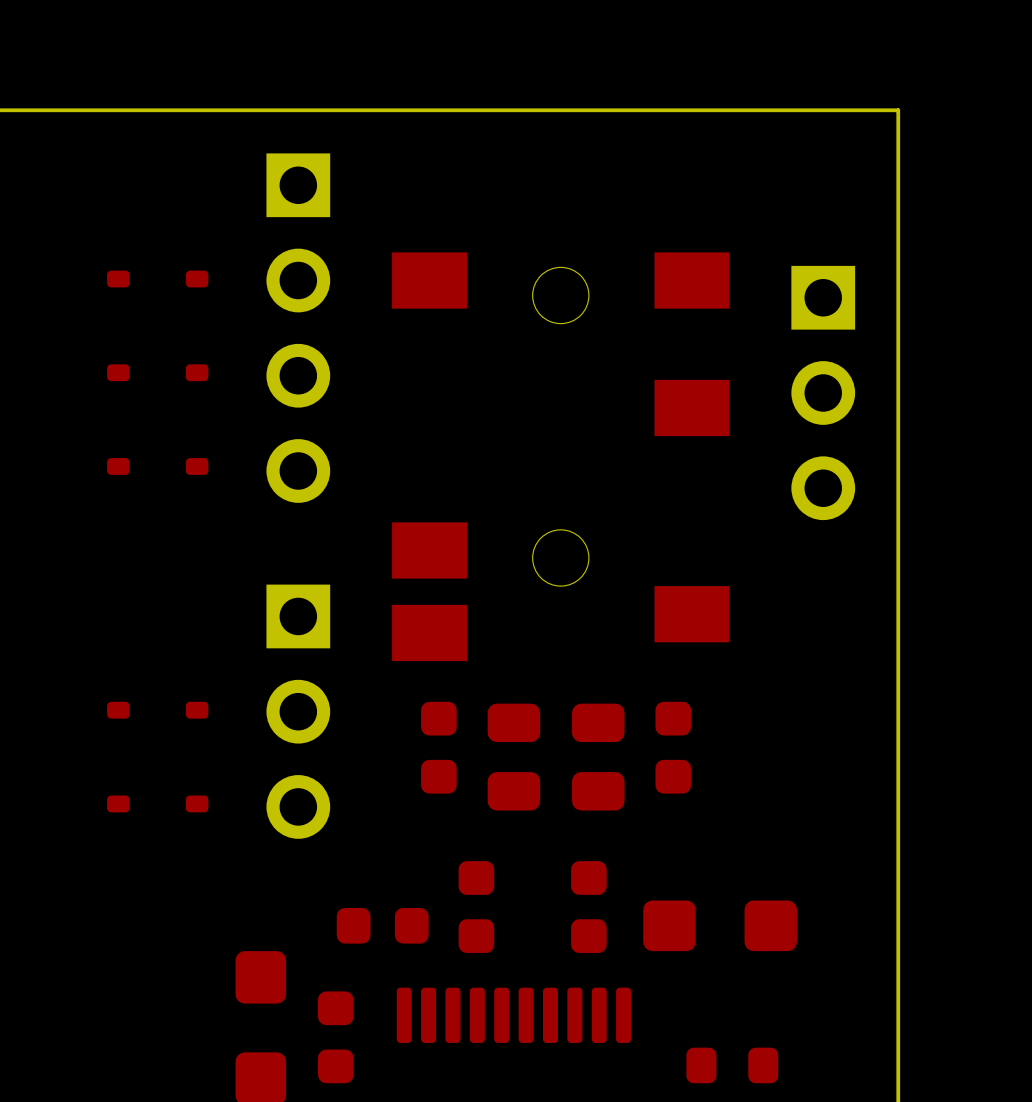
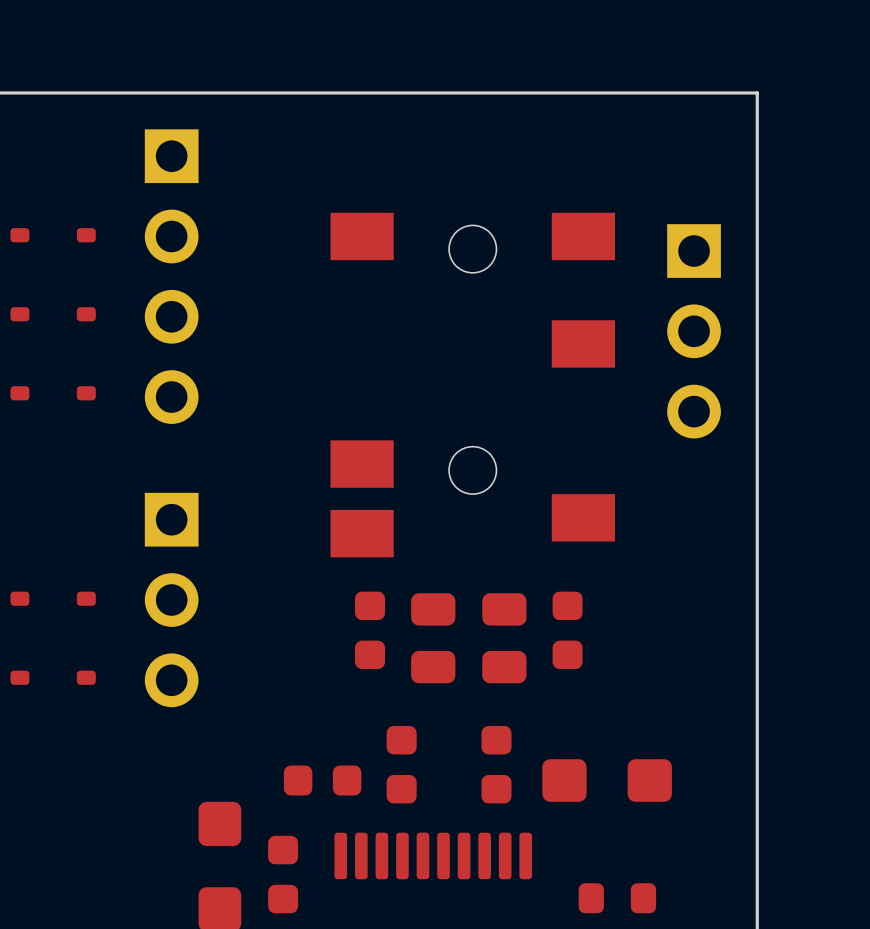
part: none -> (53, 235)
part: (157, 279) -> none
part position: (298, 328) -> (171, 276)
part: none -> (53, 314)
part: (157, 372) -> none
part: none -> (53, 393)
part: (157, 466) -> none
part: none -> (53, 598)
part: (157, 710) -> none
part position: (298, 711) -> (171, 600)
part: none -> (53, 677)
part: (157, 803) -> none

